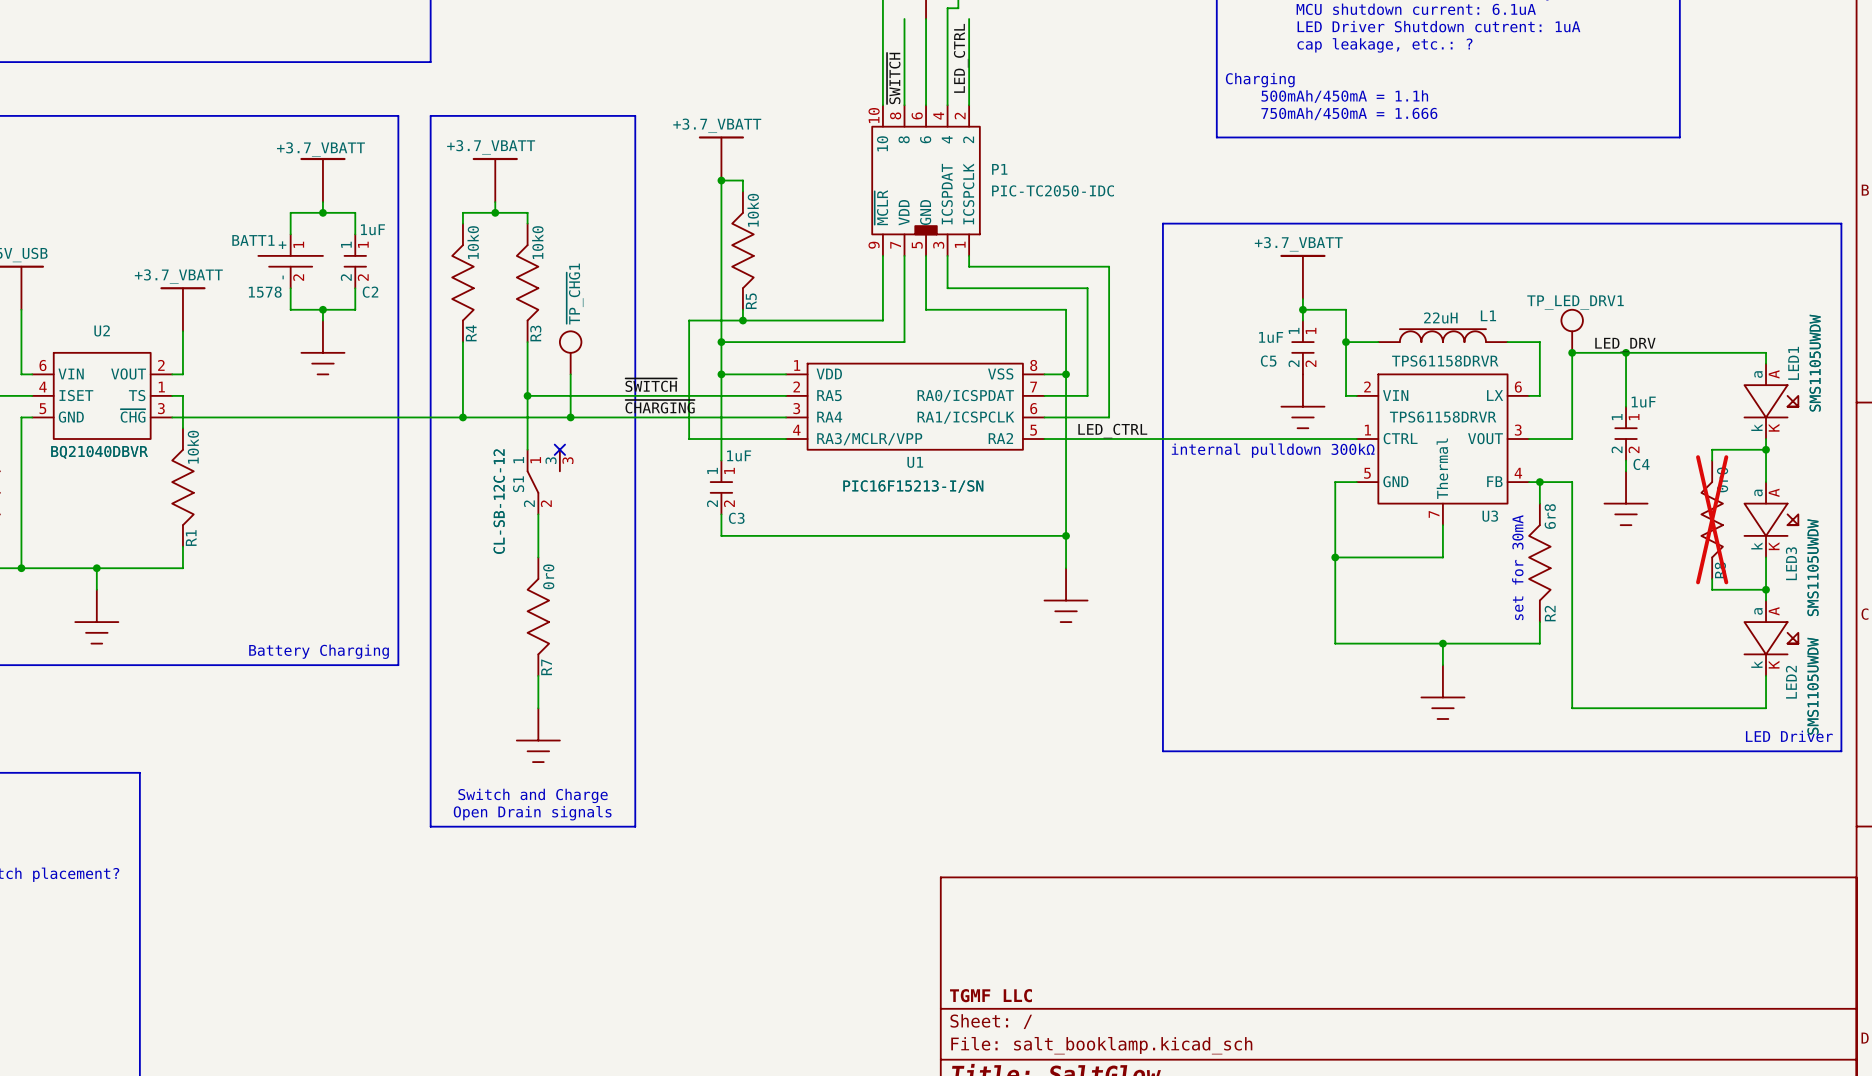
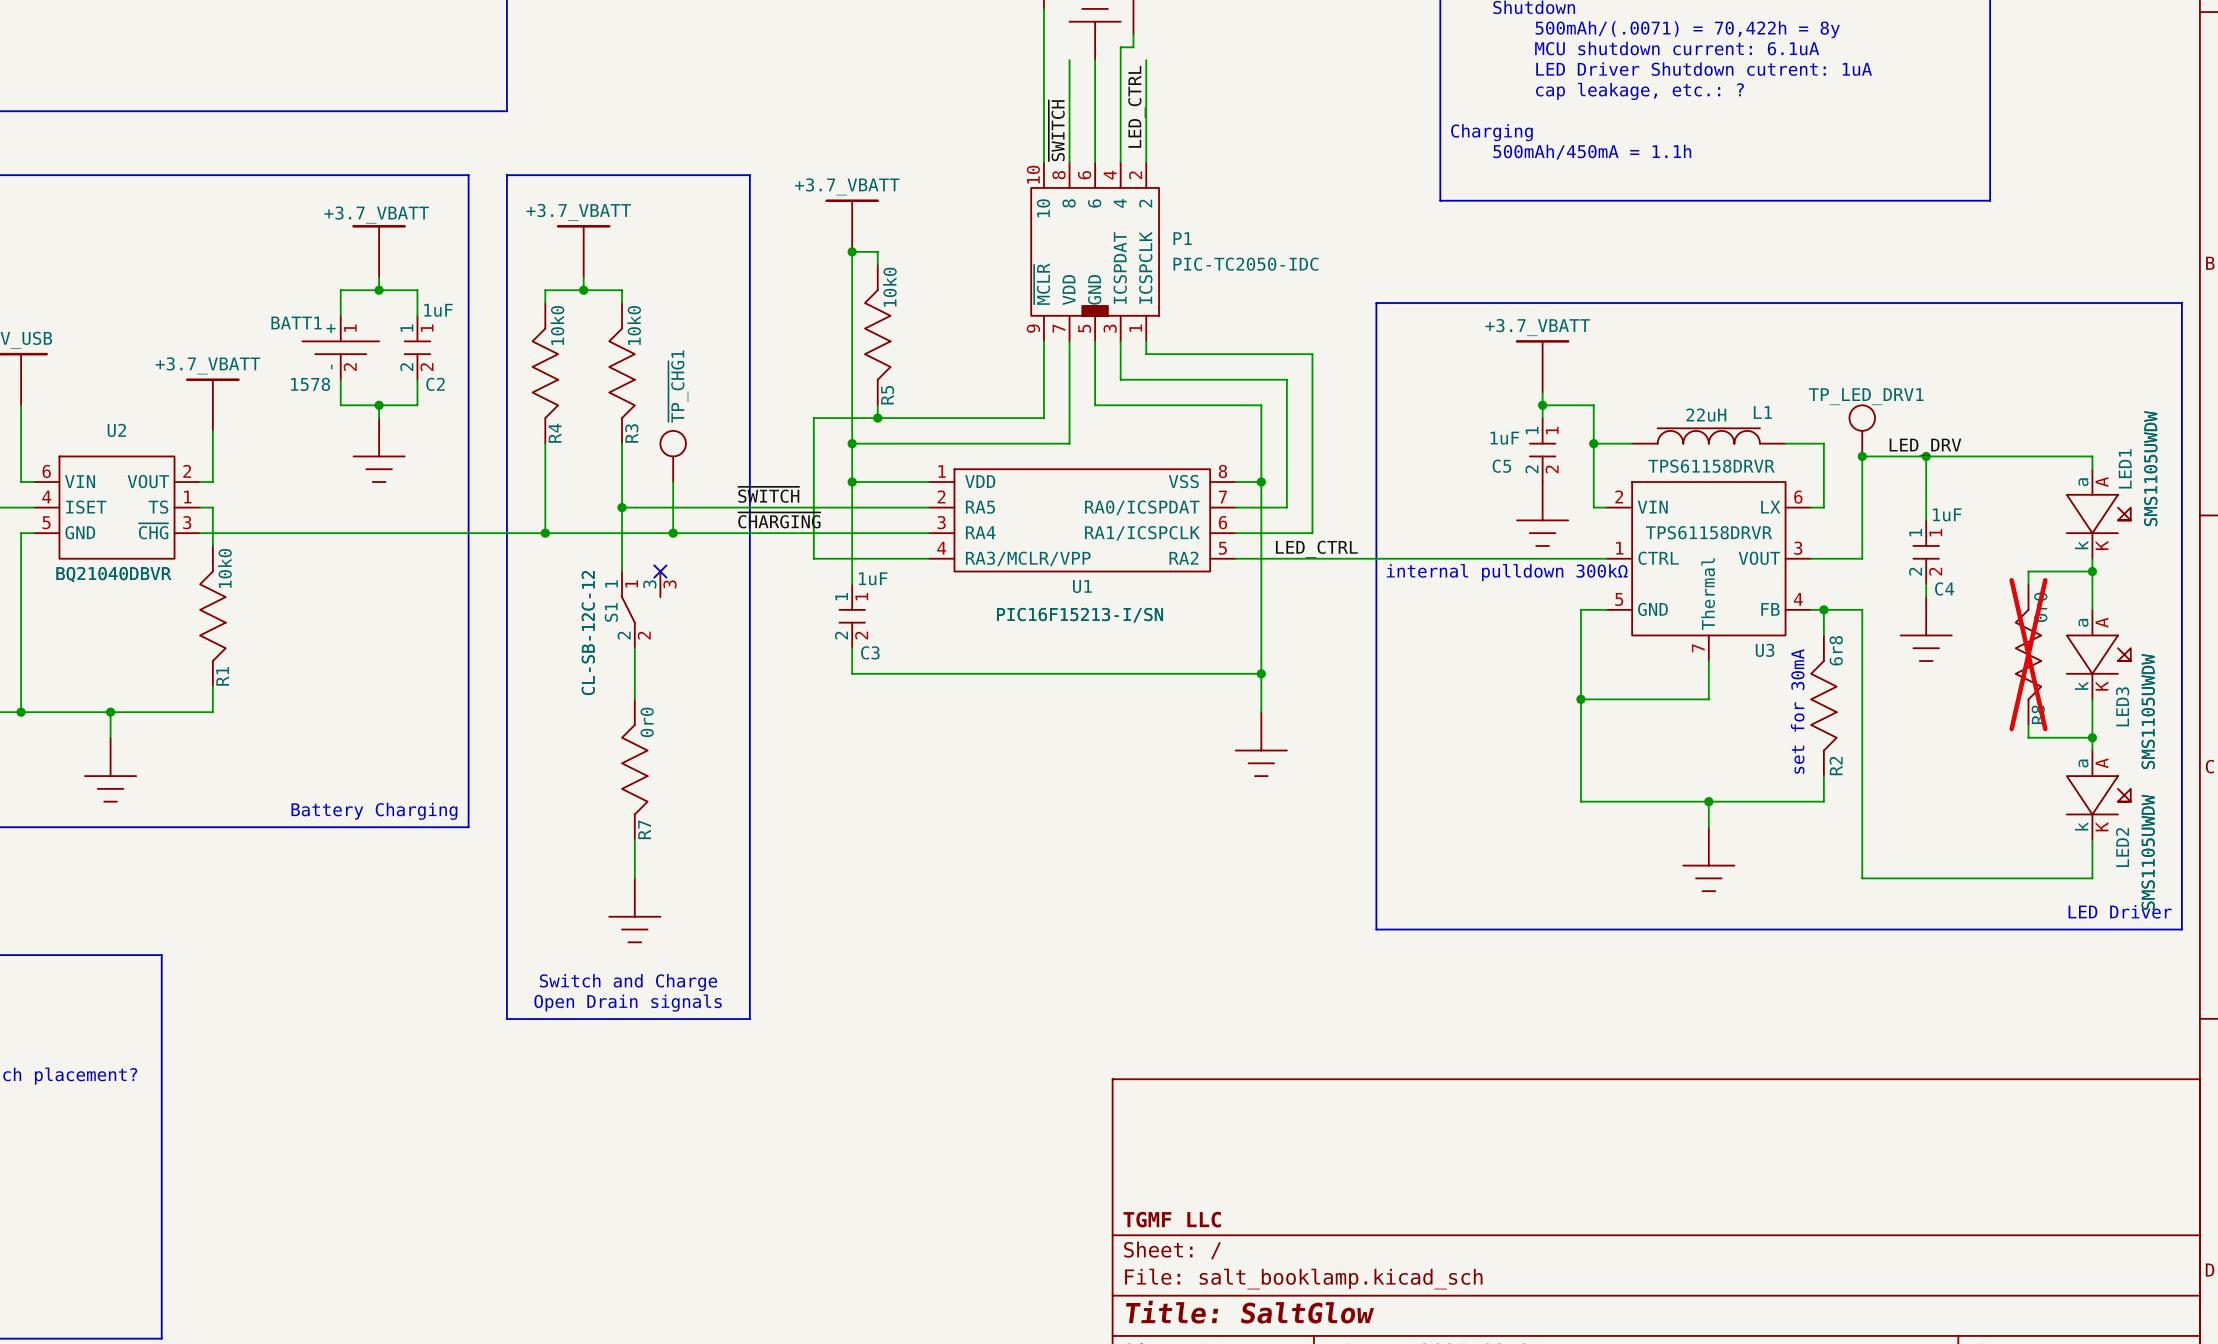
text: 750mAh/450mA = 1.666 (1349, 113) -> none

